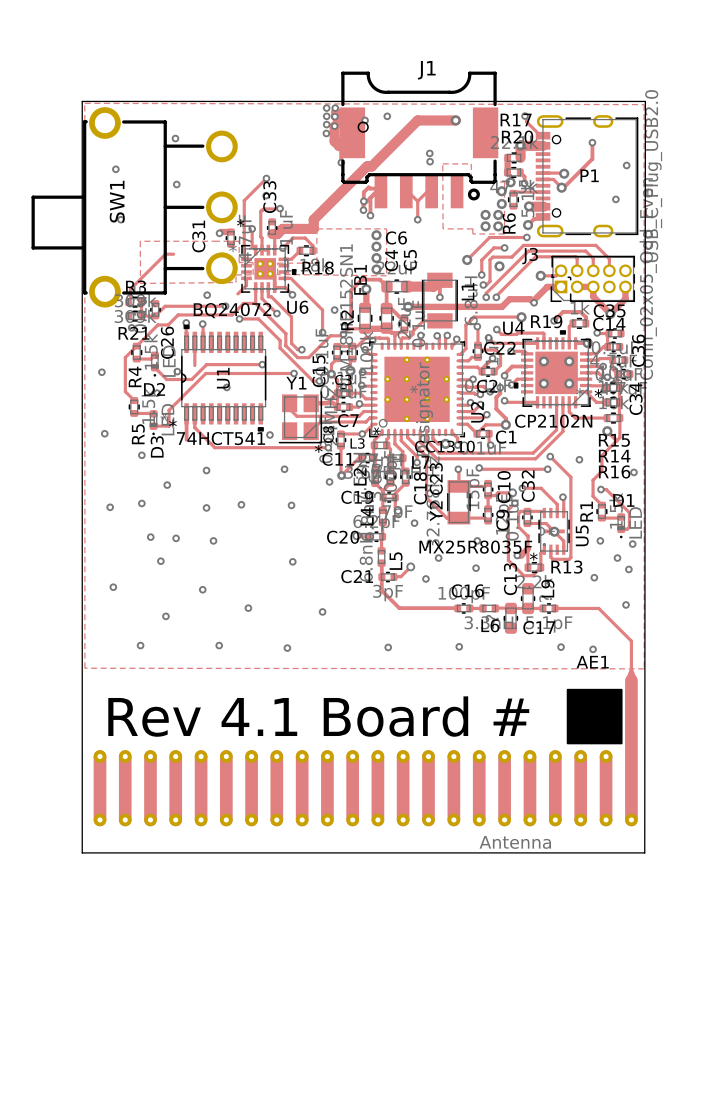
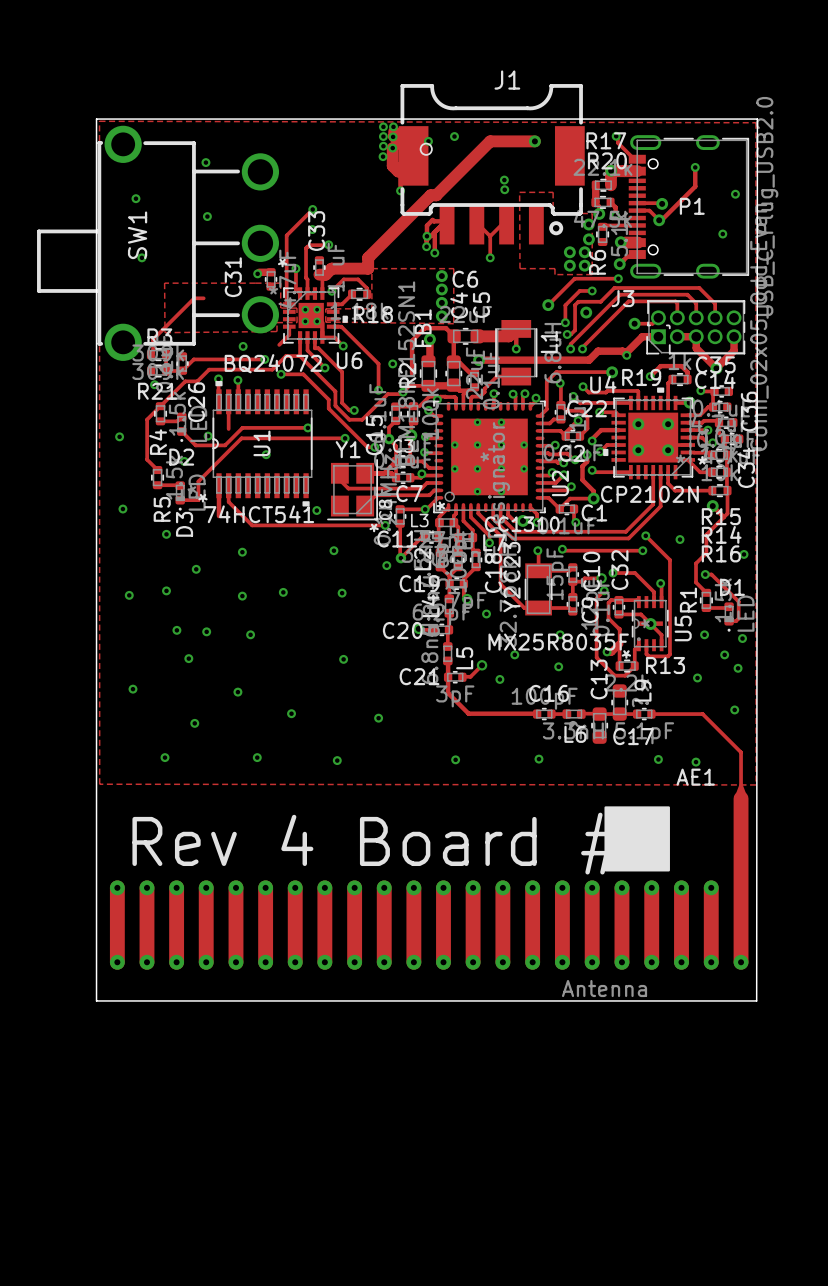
text: Rev 4.1 Board # (318, 716) -> Rev 4 Board # (377, 843)
drawing position: (594, 716) -> (637, 838)

